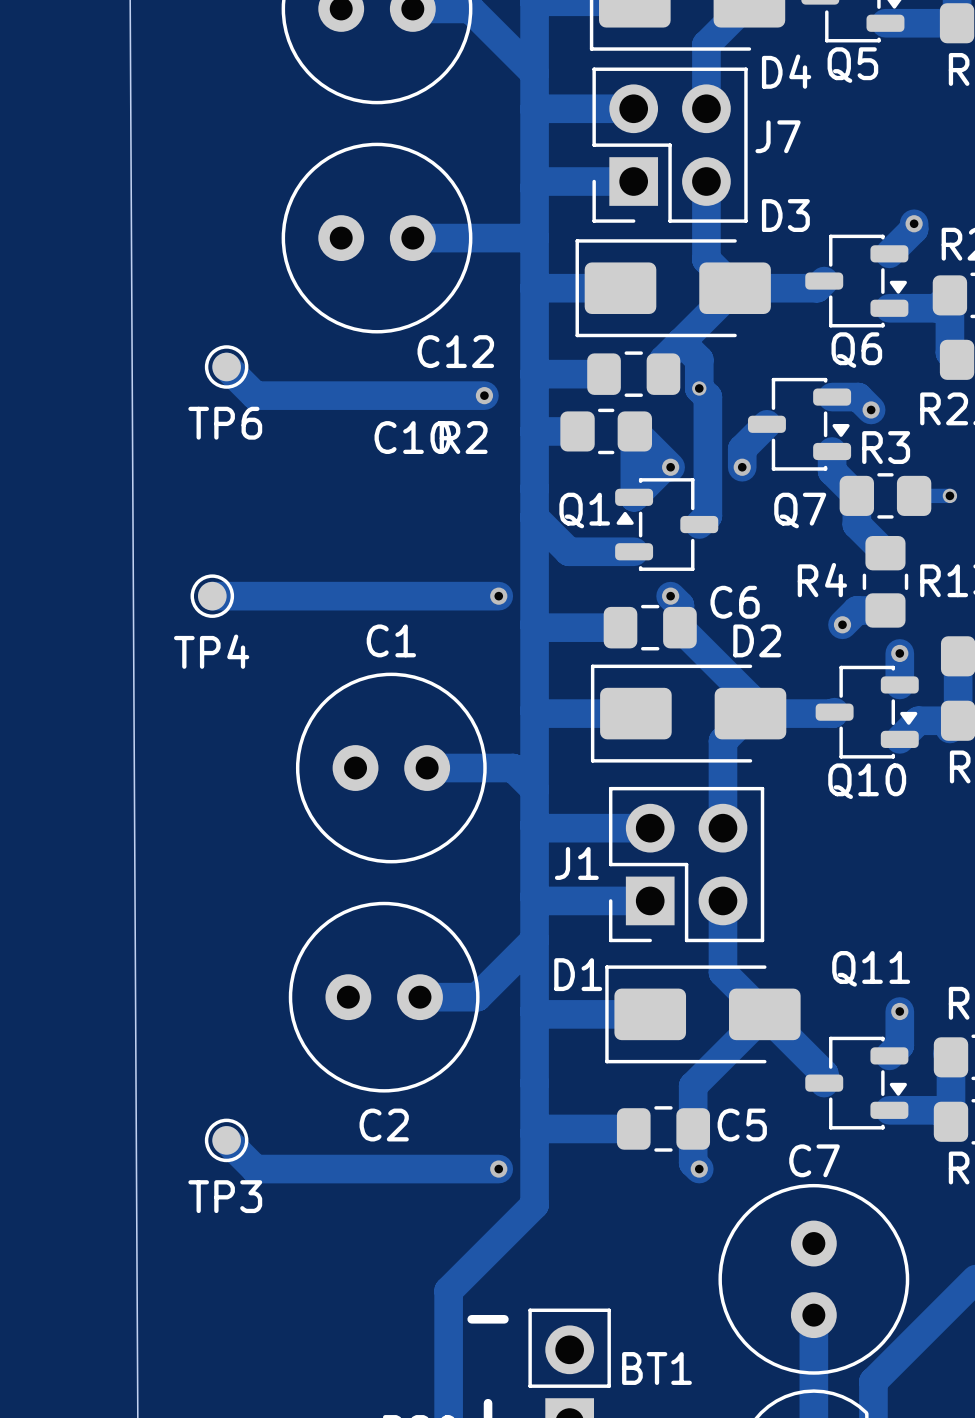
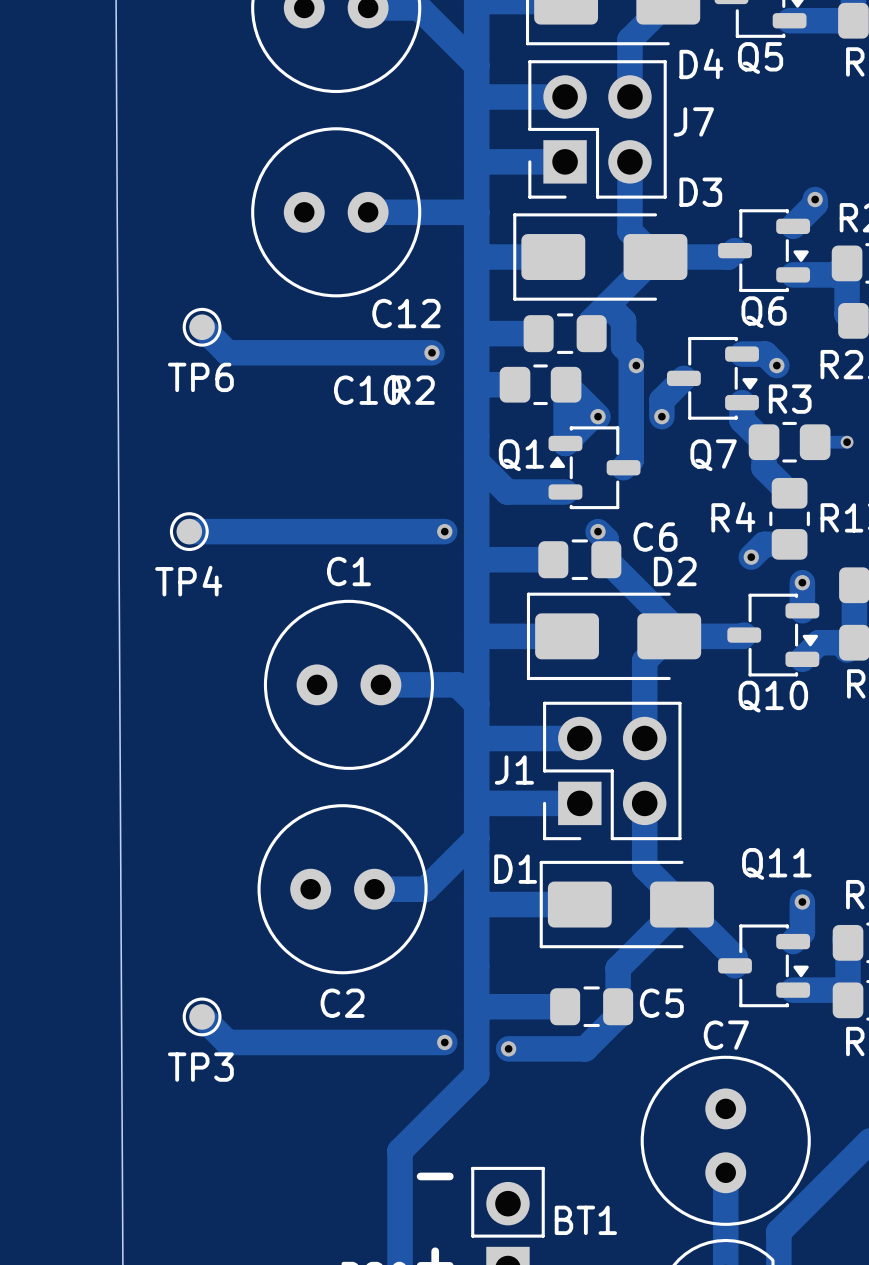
via: (699, 388) -> none
via: none -> (636, 365)
track: (693, 1139) (693, 1162) (699, 1169) -> (618, 1015) (585, 1048) (508, 1048)
via position: (699, 1169) -> (508, 1048)

